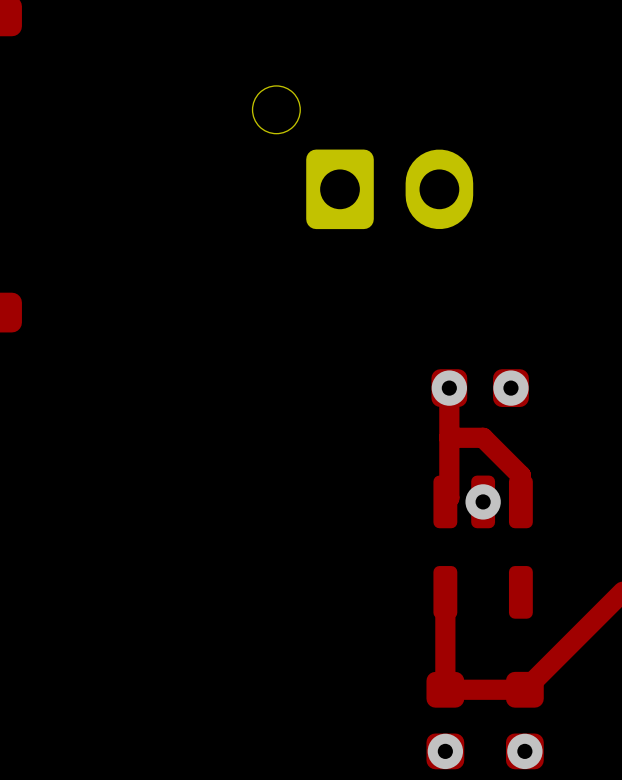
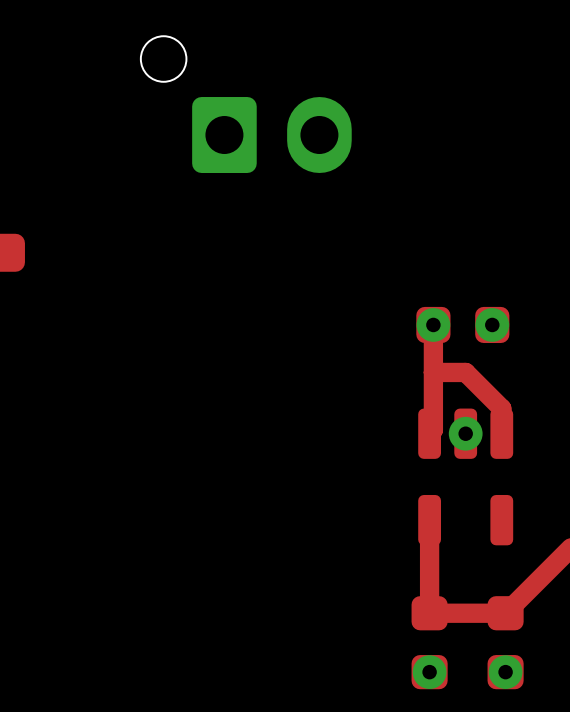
part position: (362, 157) -> (246, 104)

